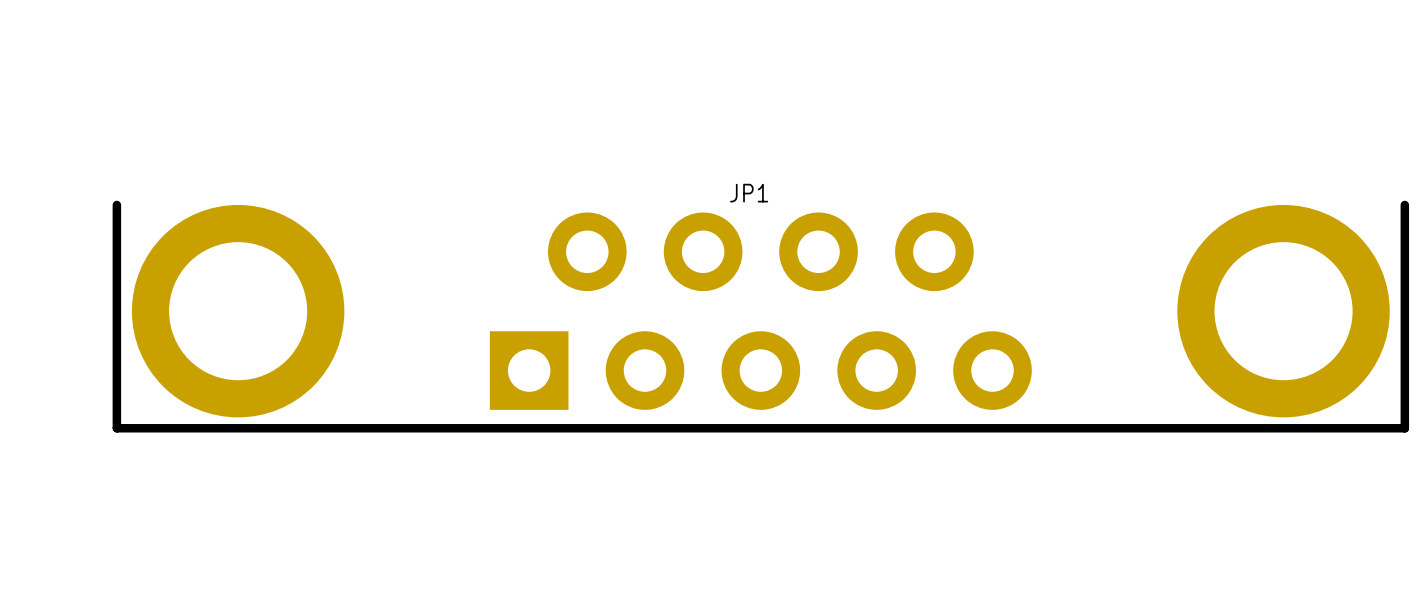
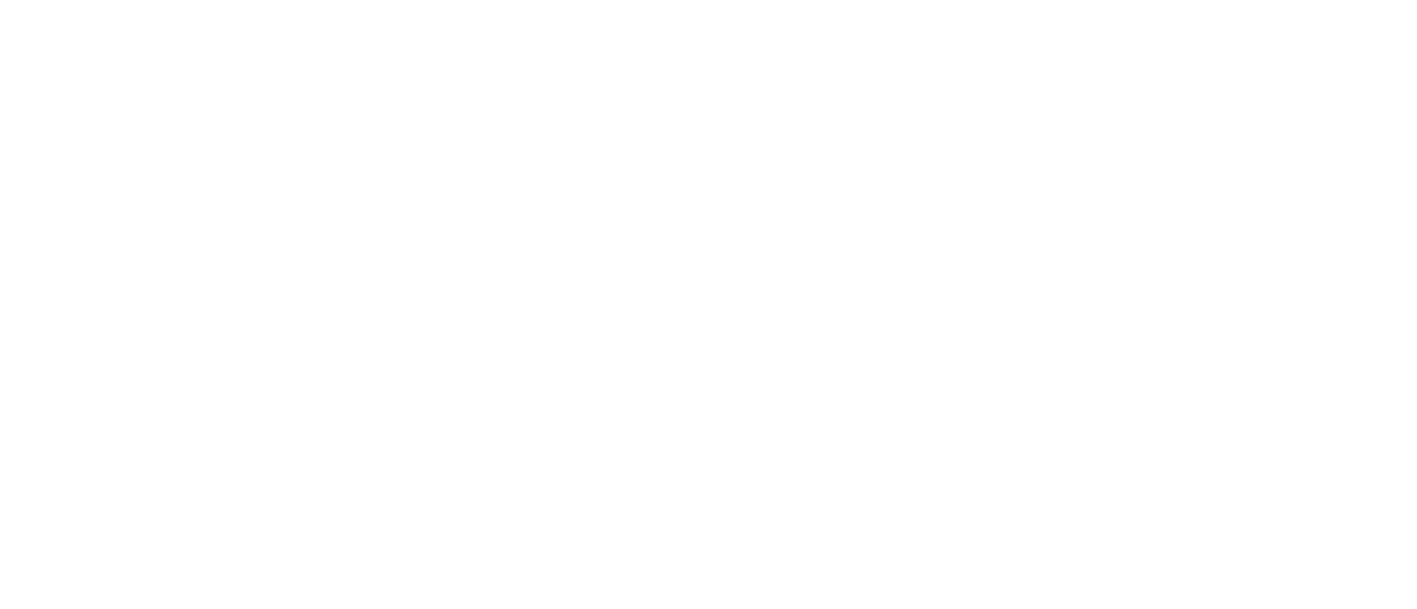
JP1: (760, 316) -> none

